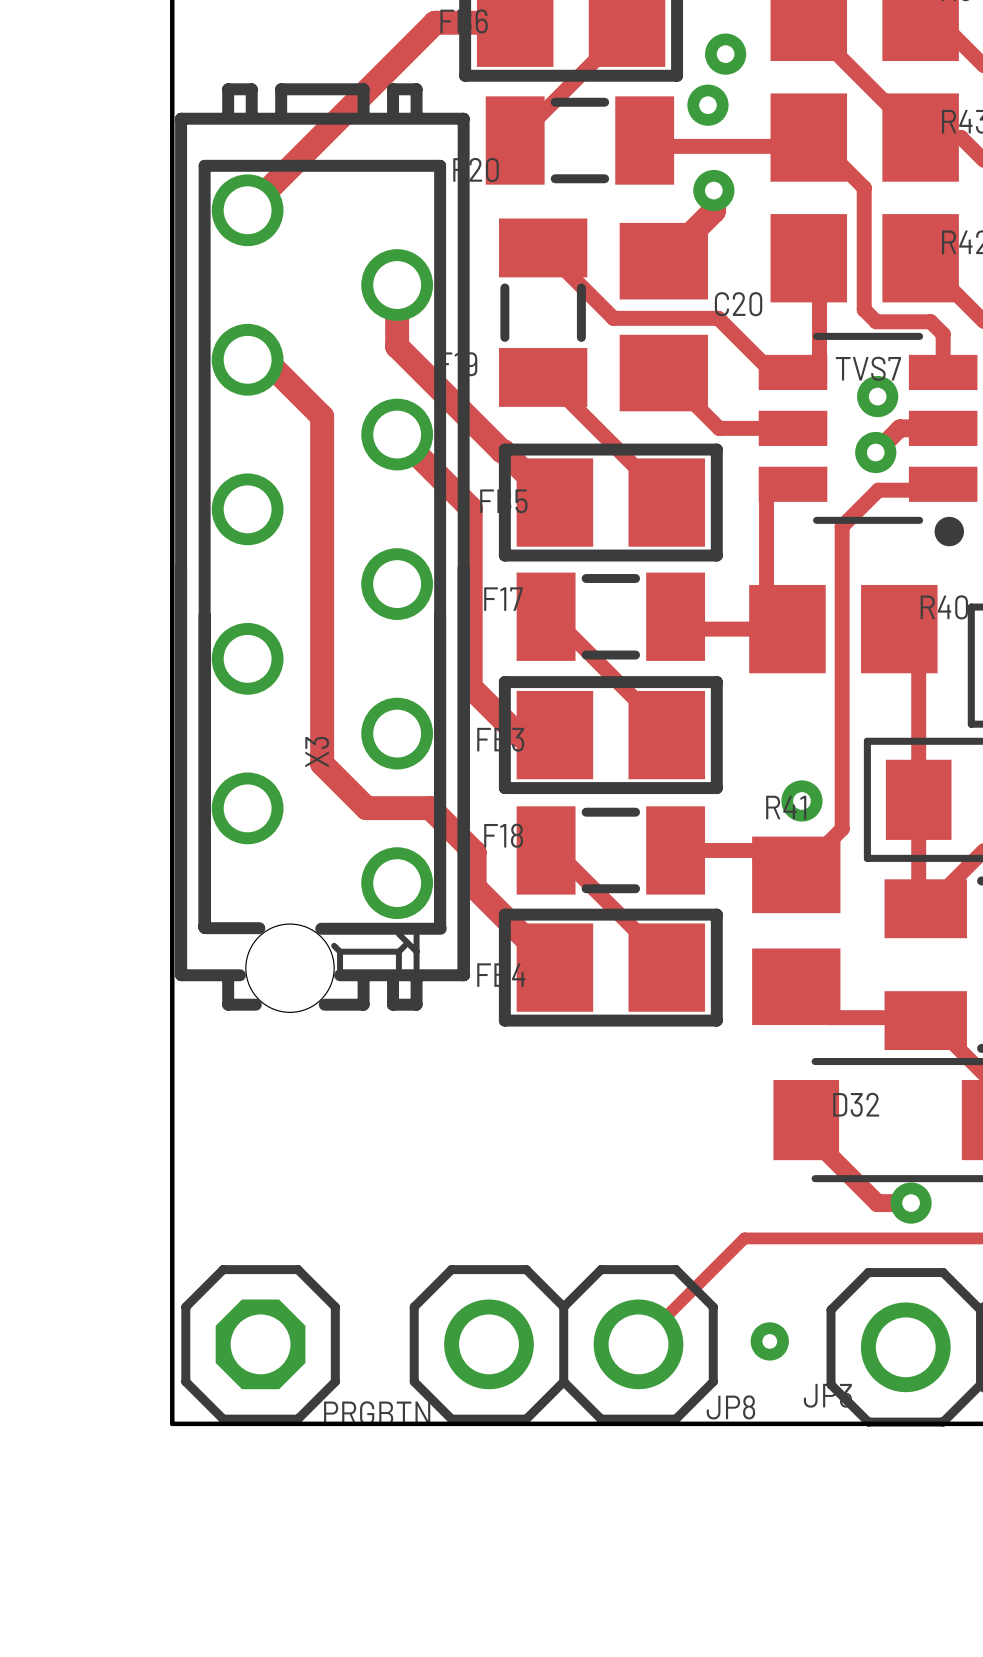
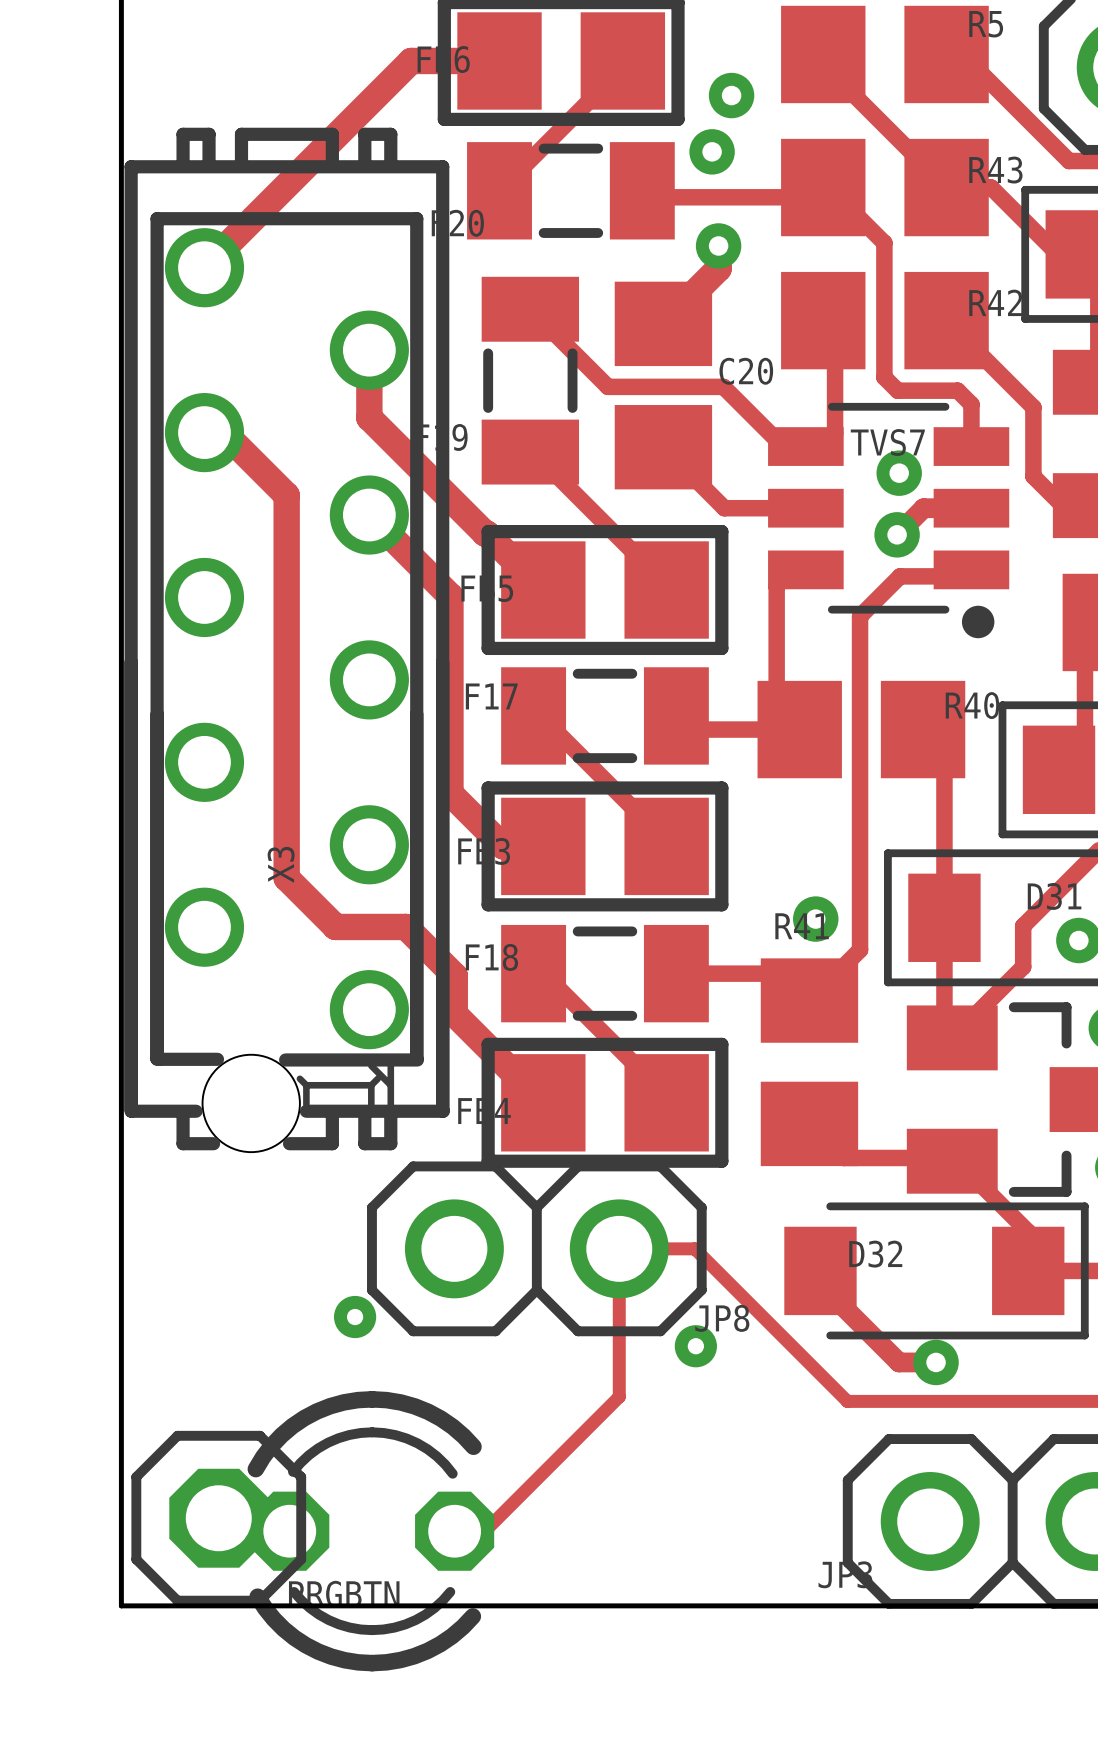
via: none -> (355, 1317)
track: (830, 1238) (744, 1238) (638, 1344) -> (847, 1401) (694, 1248) (619, 1248) (619, 1396) (484, 1531) (454, 1531)
via position: (769, 1341) -> (695, 1346)
JP8 position: (563, 1344) -> (536, 1248)
part: none -> (370, 1531)

